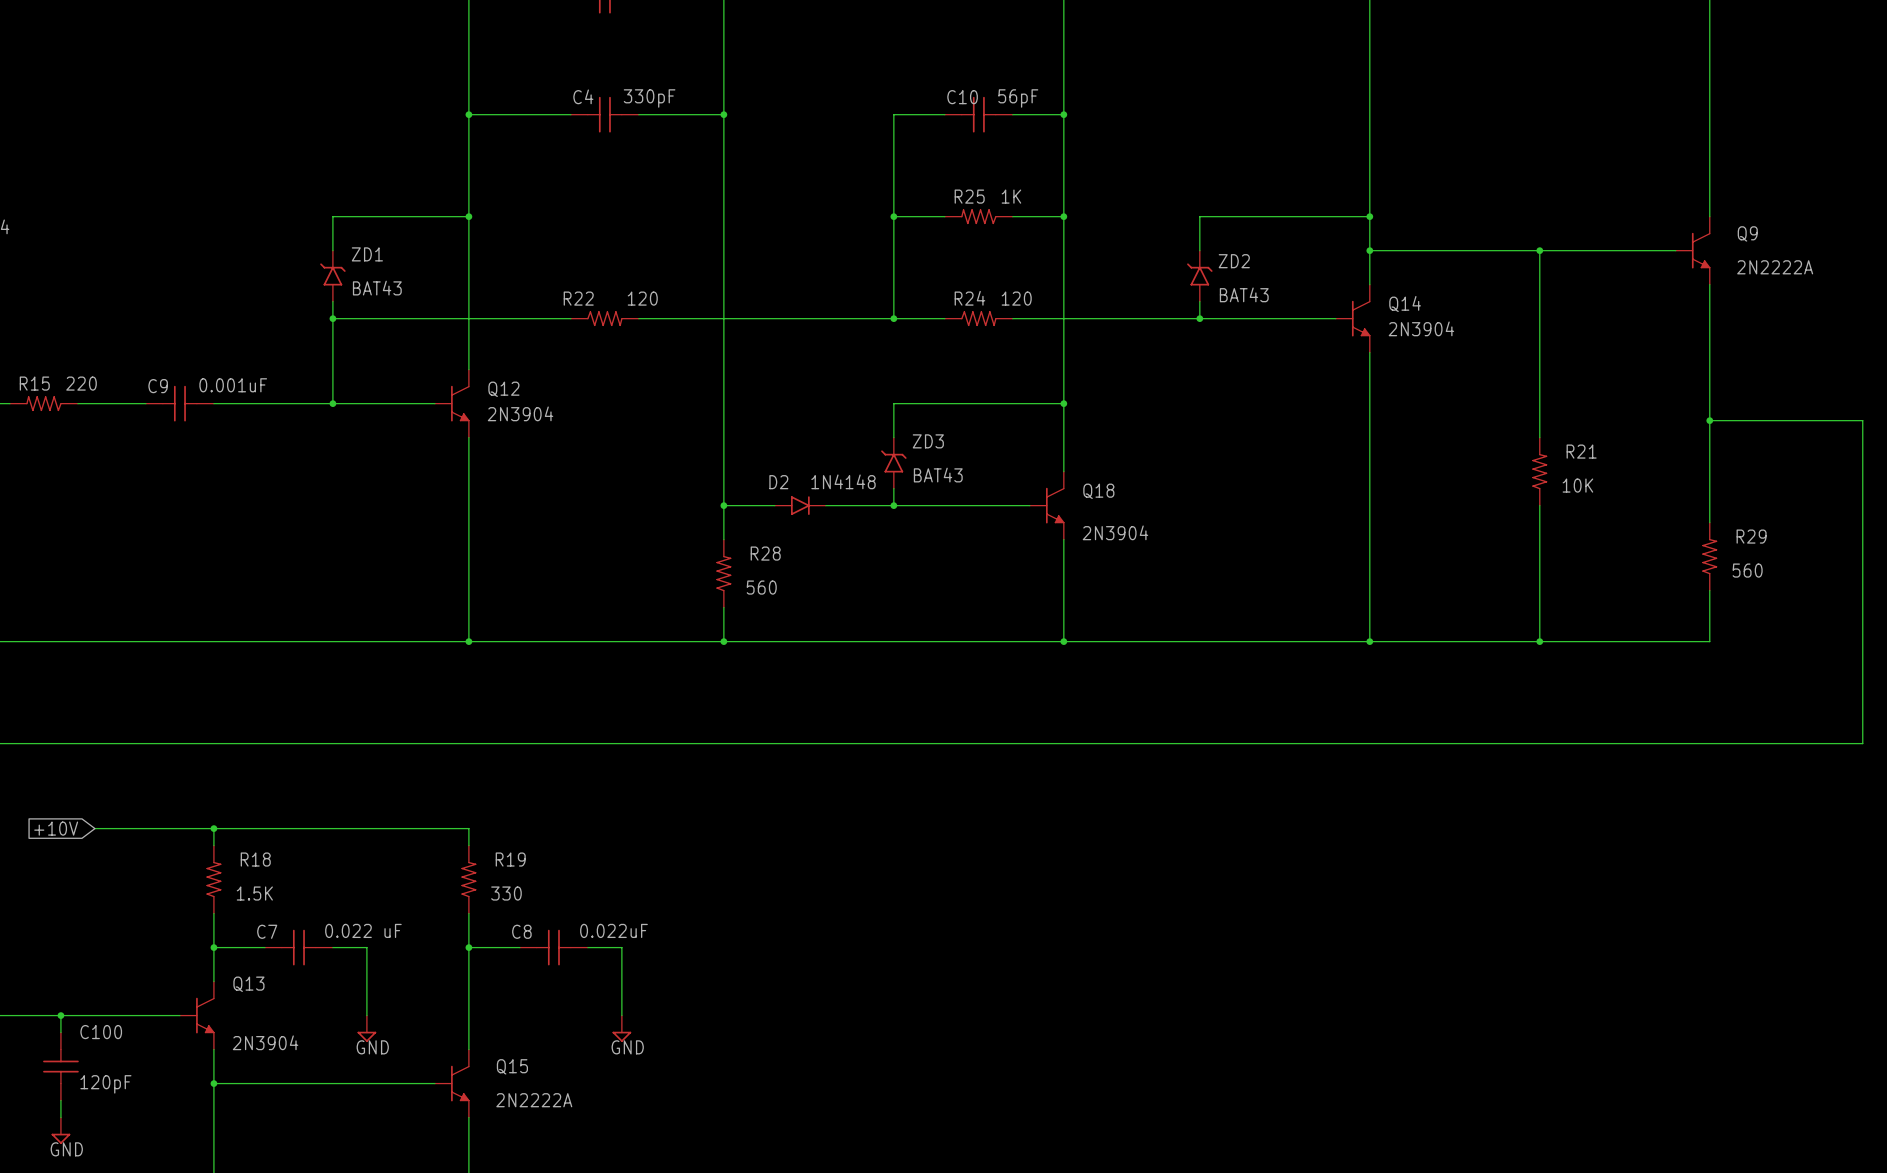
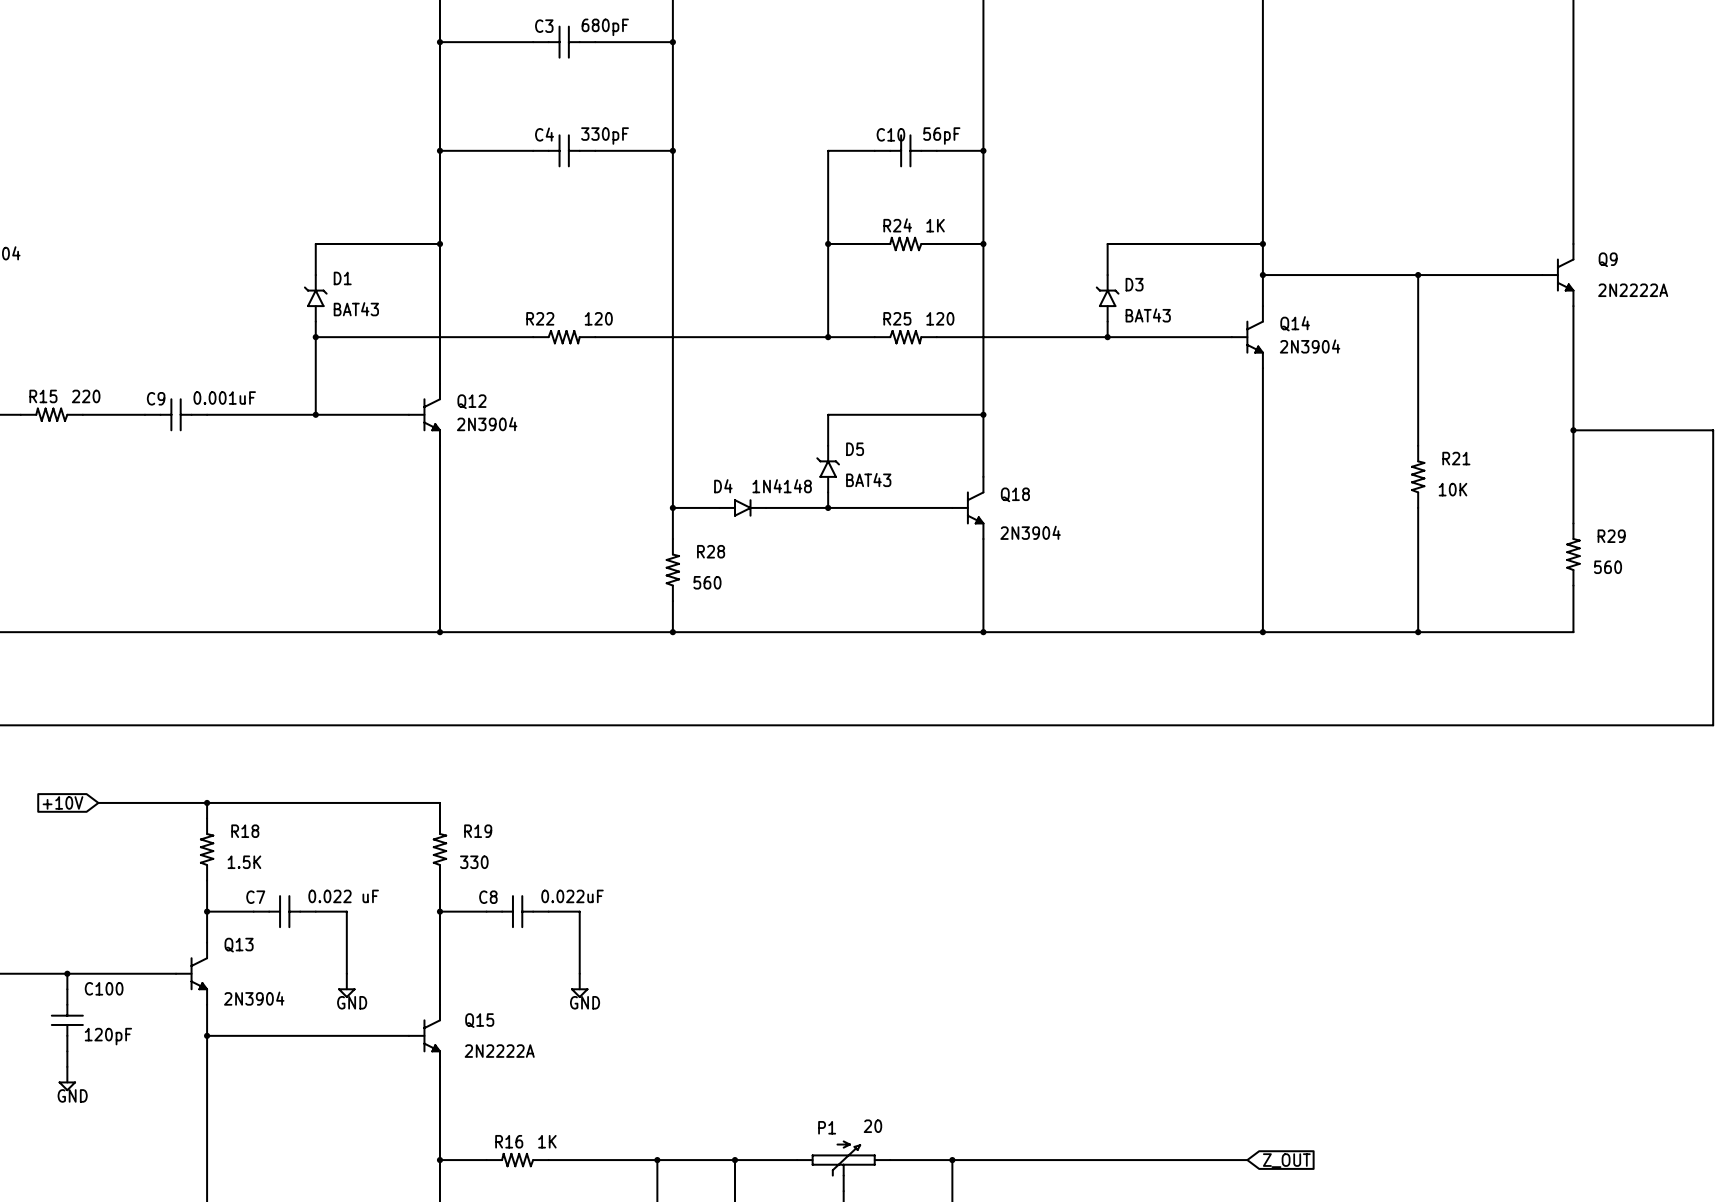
R25 name: R25 (969, 196) -> R24 (897, 225)
ZD1 name: ZD1 (367, 254) -> D1 (342, 278)
ZD2 name: ZD2 (1234, 261) -> D3 (1134, 284)
R24 name: R24 (969, 298) -> R25 (897, 318)
ZD3 name: ZD3 (928, 441) -> D5 (855, 449)
D2 name: D2 (778, 482) -> D4 (723, 486)

